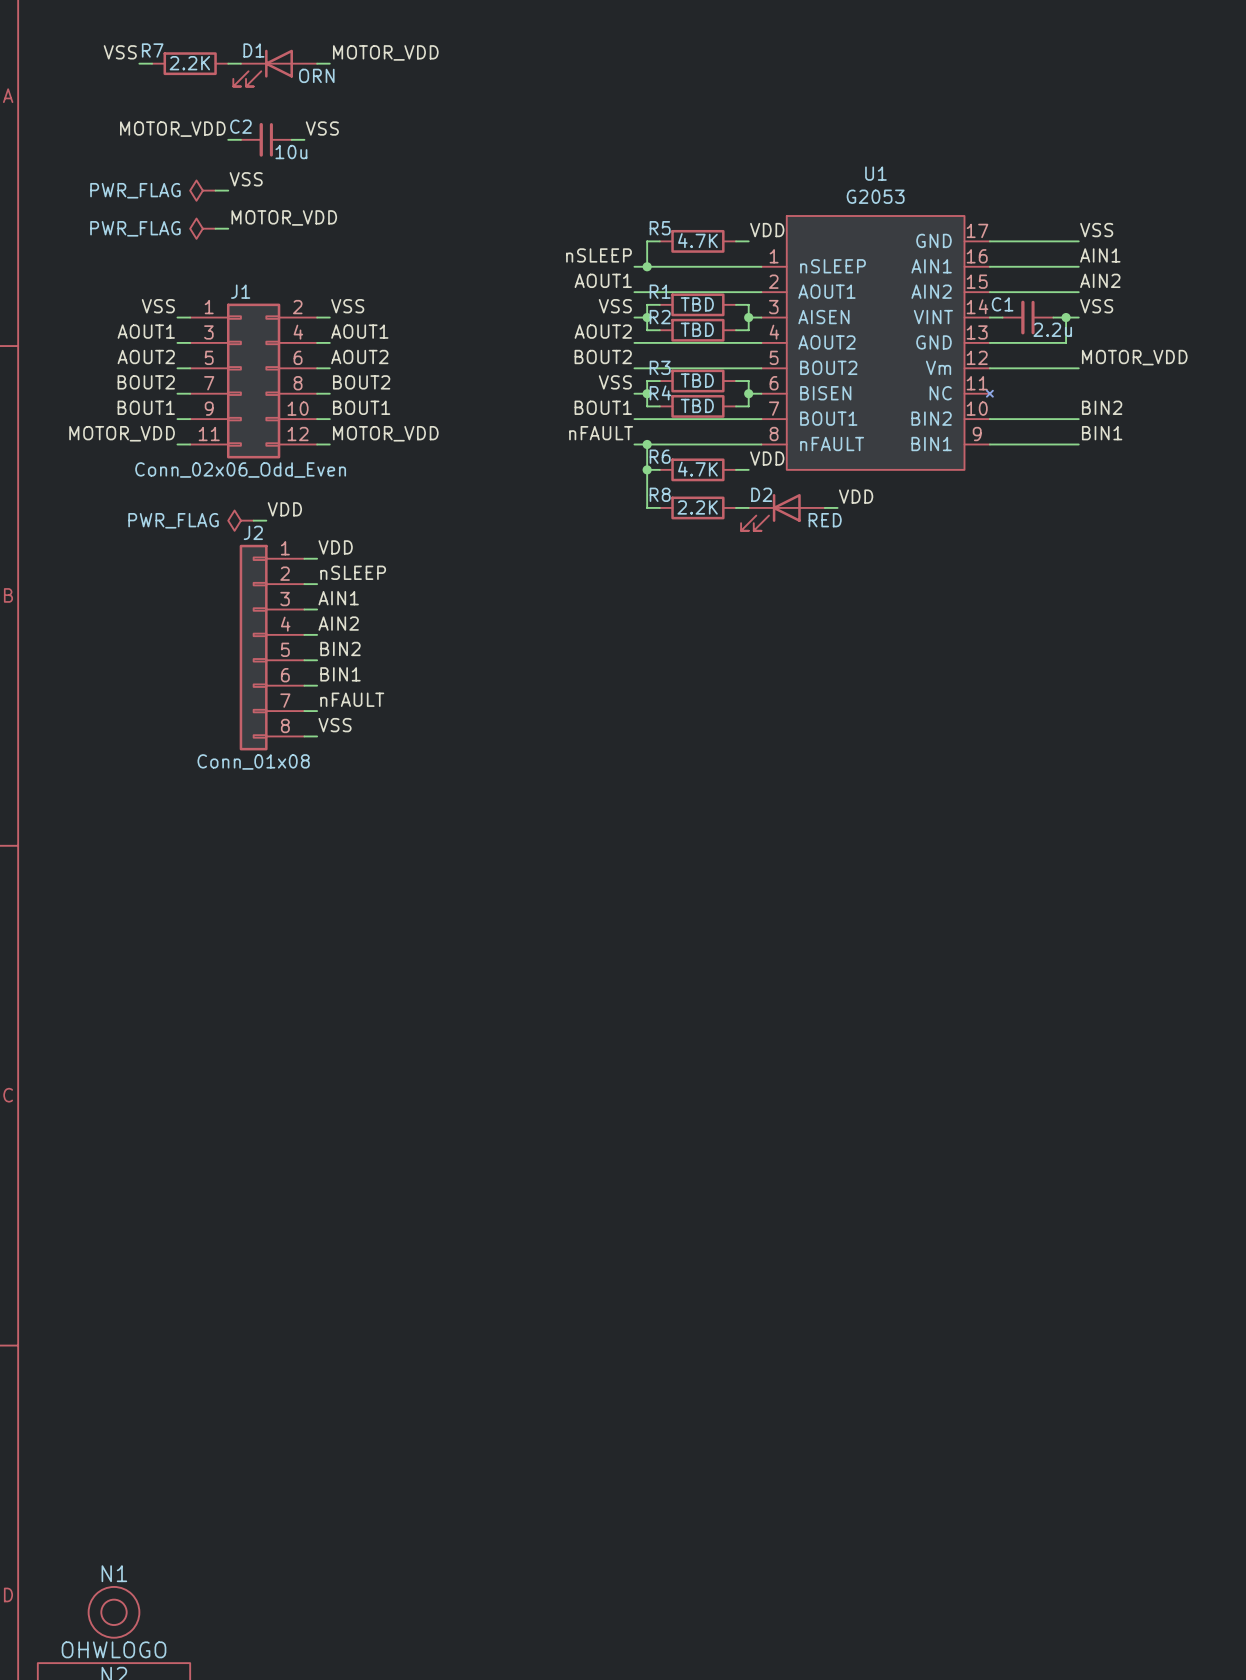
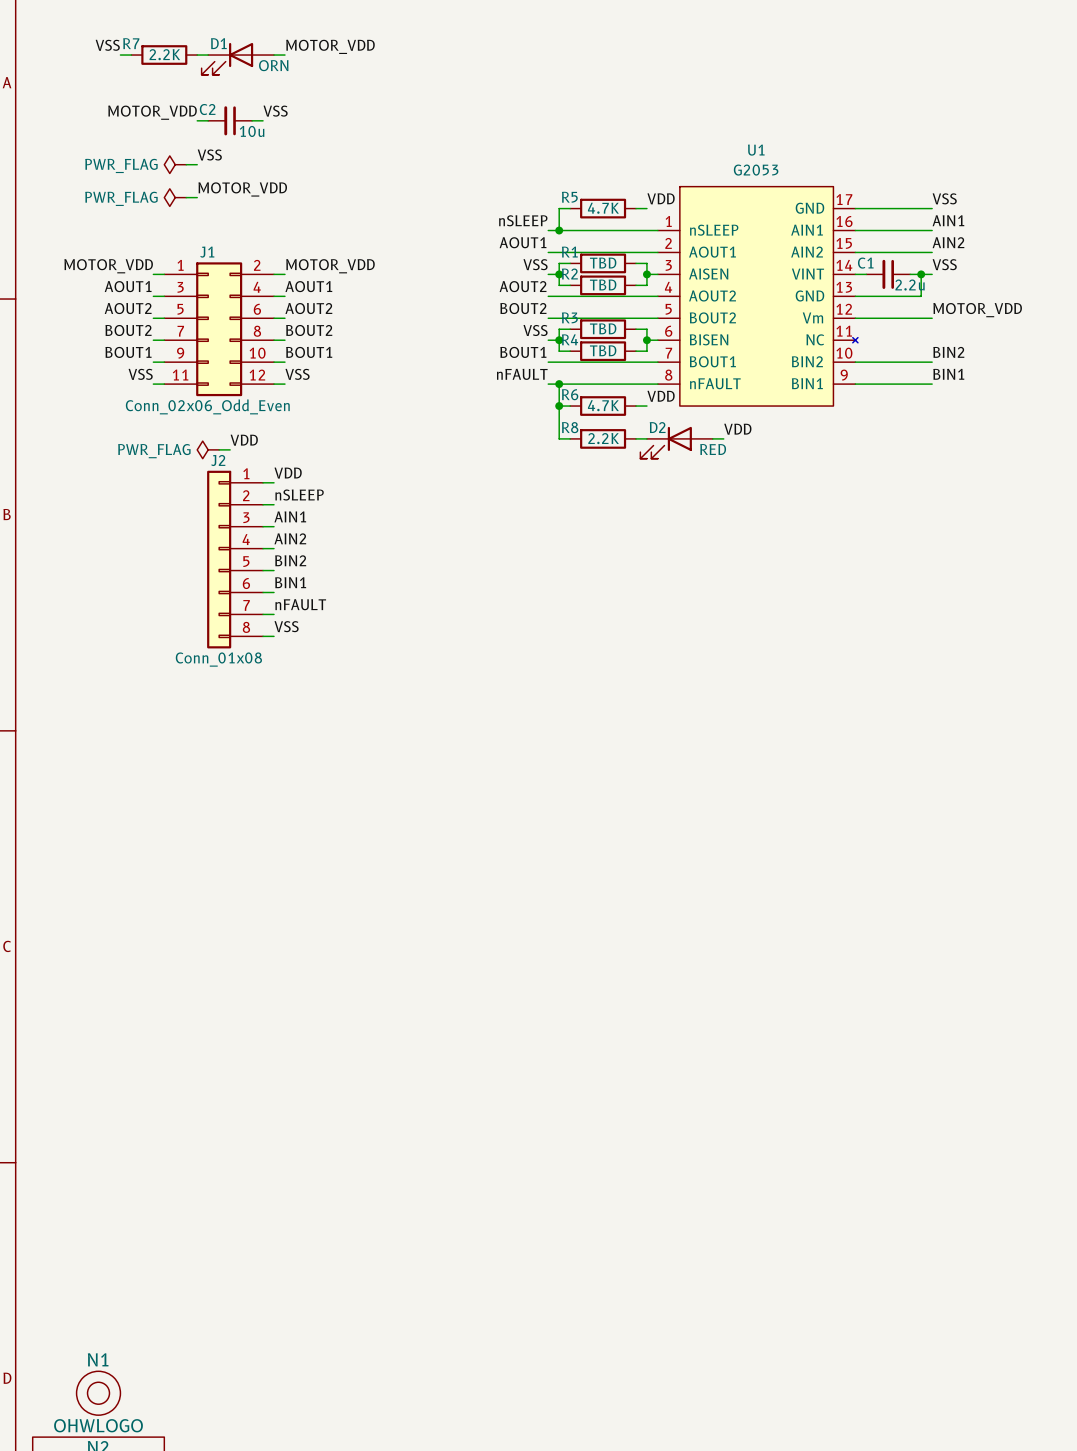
label: VSS (158, 306) -> MOTOR_VDD (108, 266)
label: VSS (347, 306) -> MOTOR_VDD (330, 266)
label: MOTOR_VDD (122, 433) -> VSS (140, 374)
label: MOTOR_VDD (385, 433) -> VSS (297, 374)

